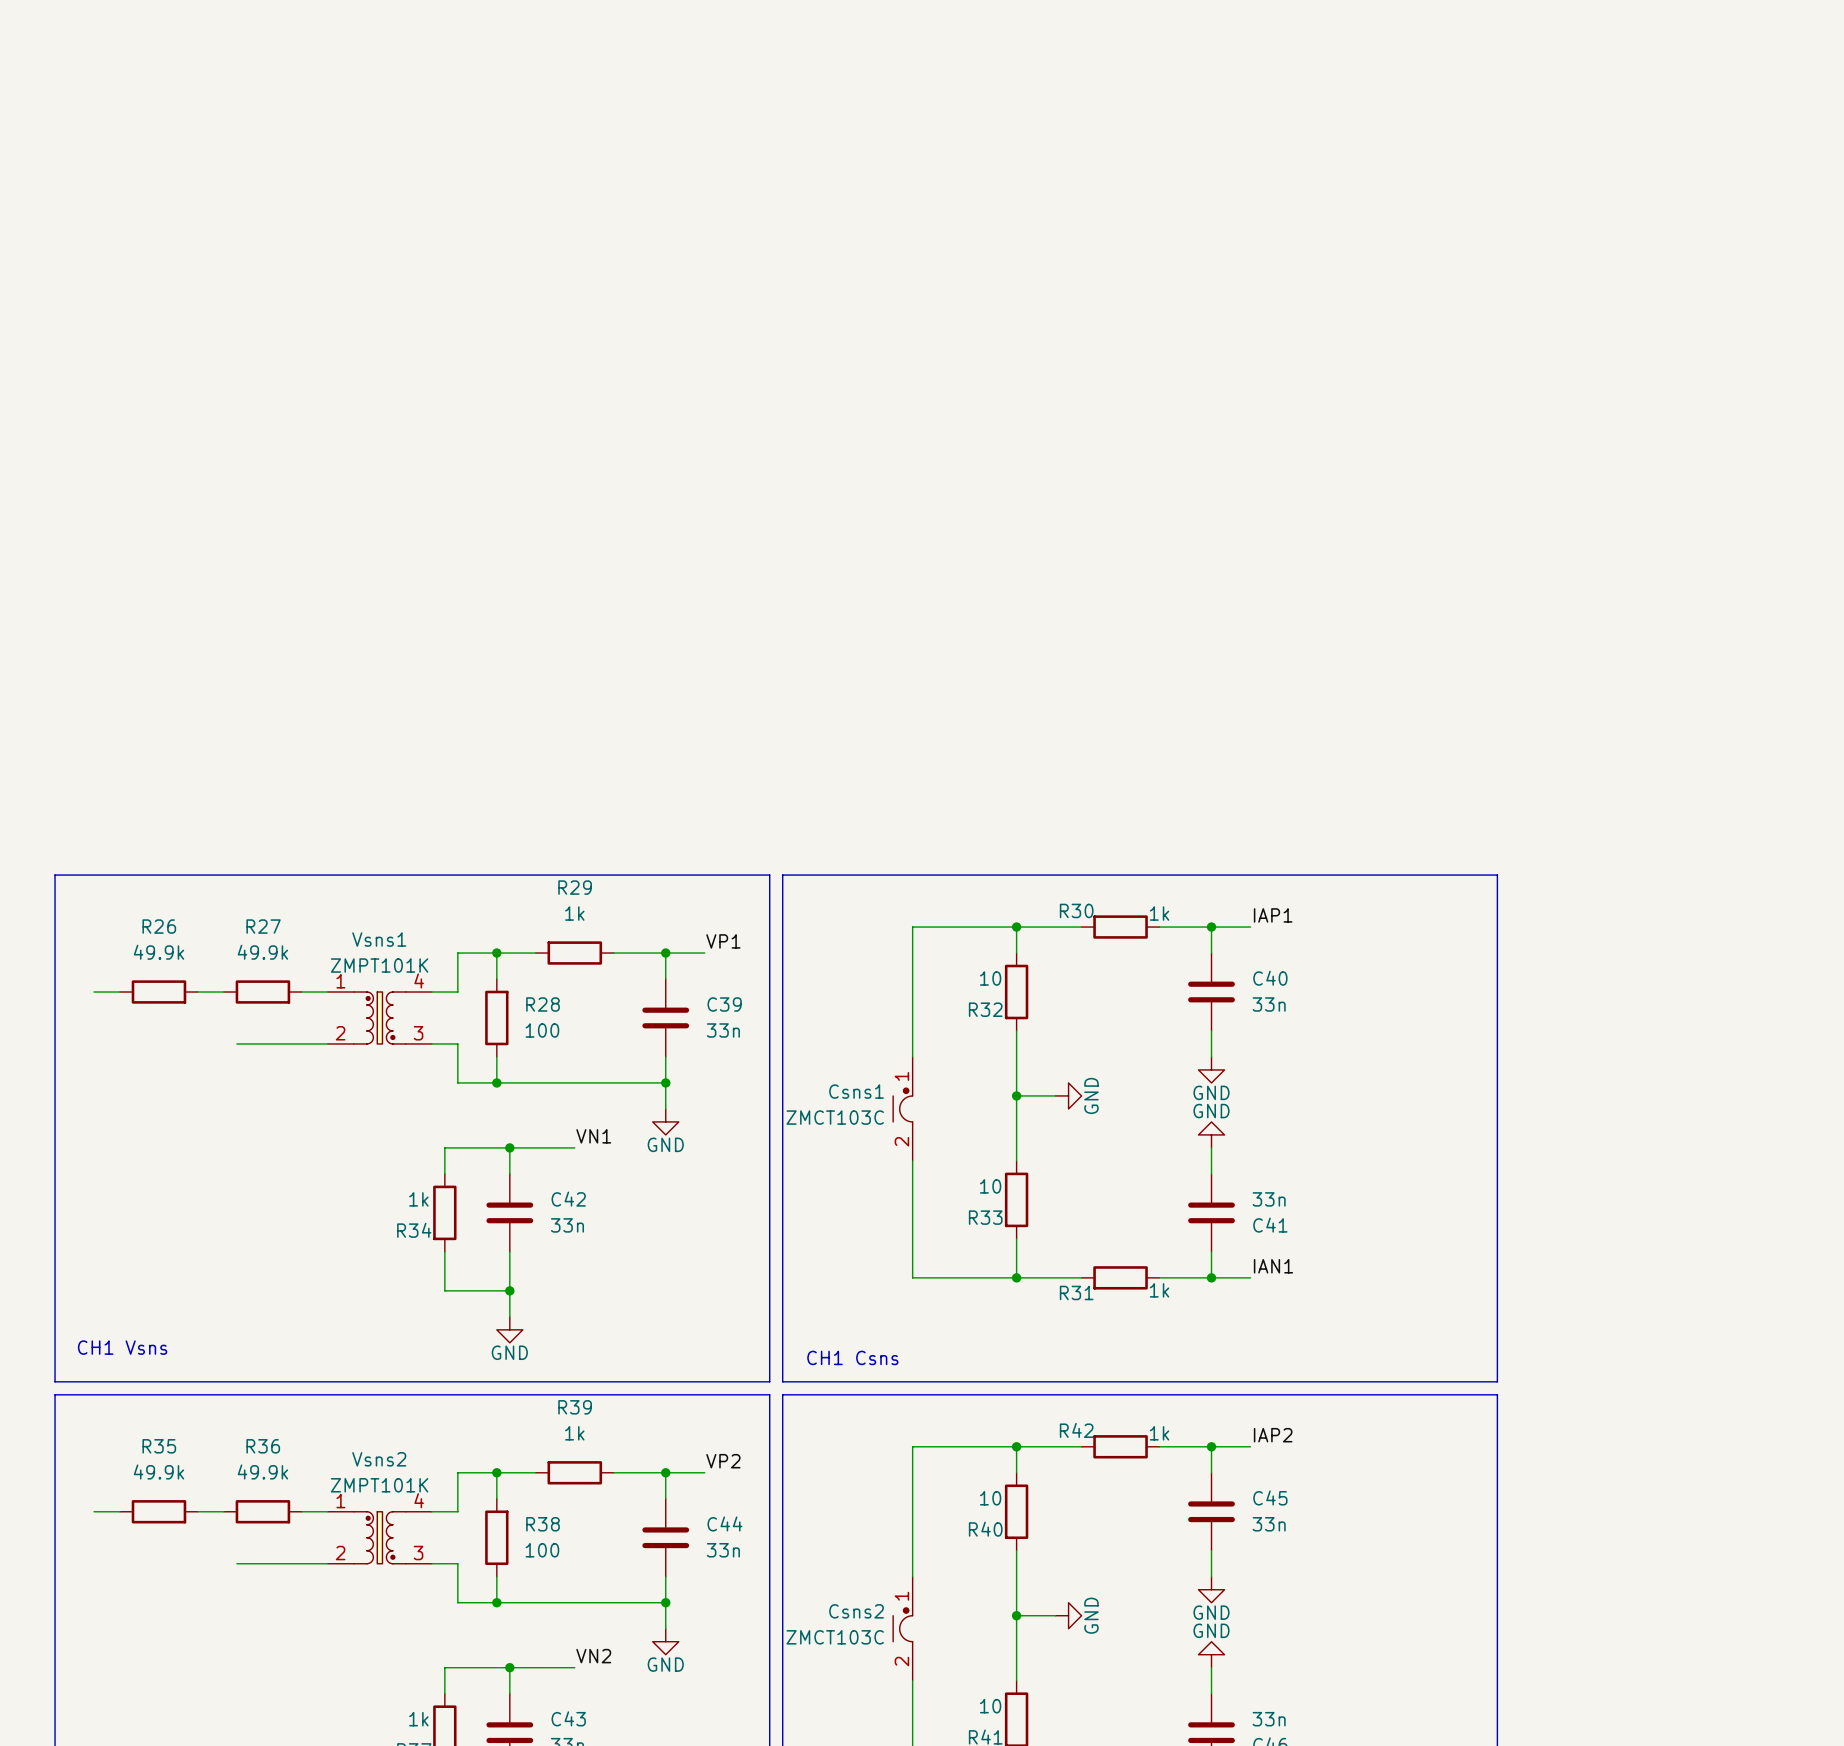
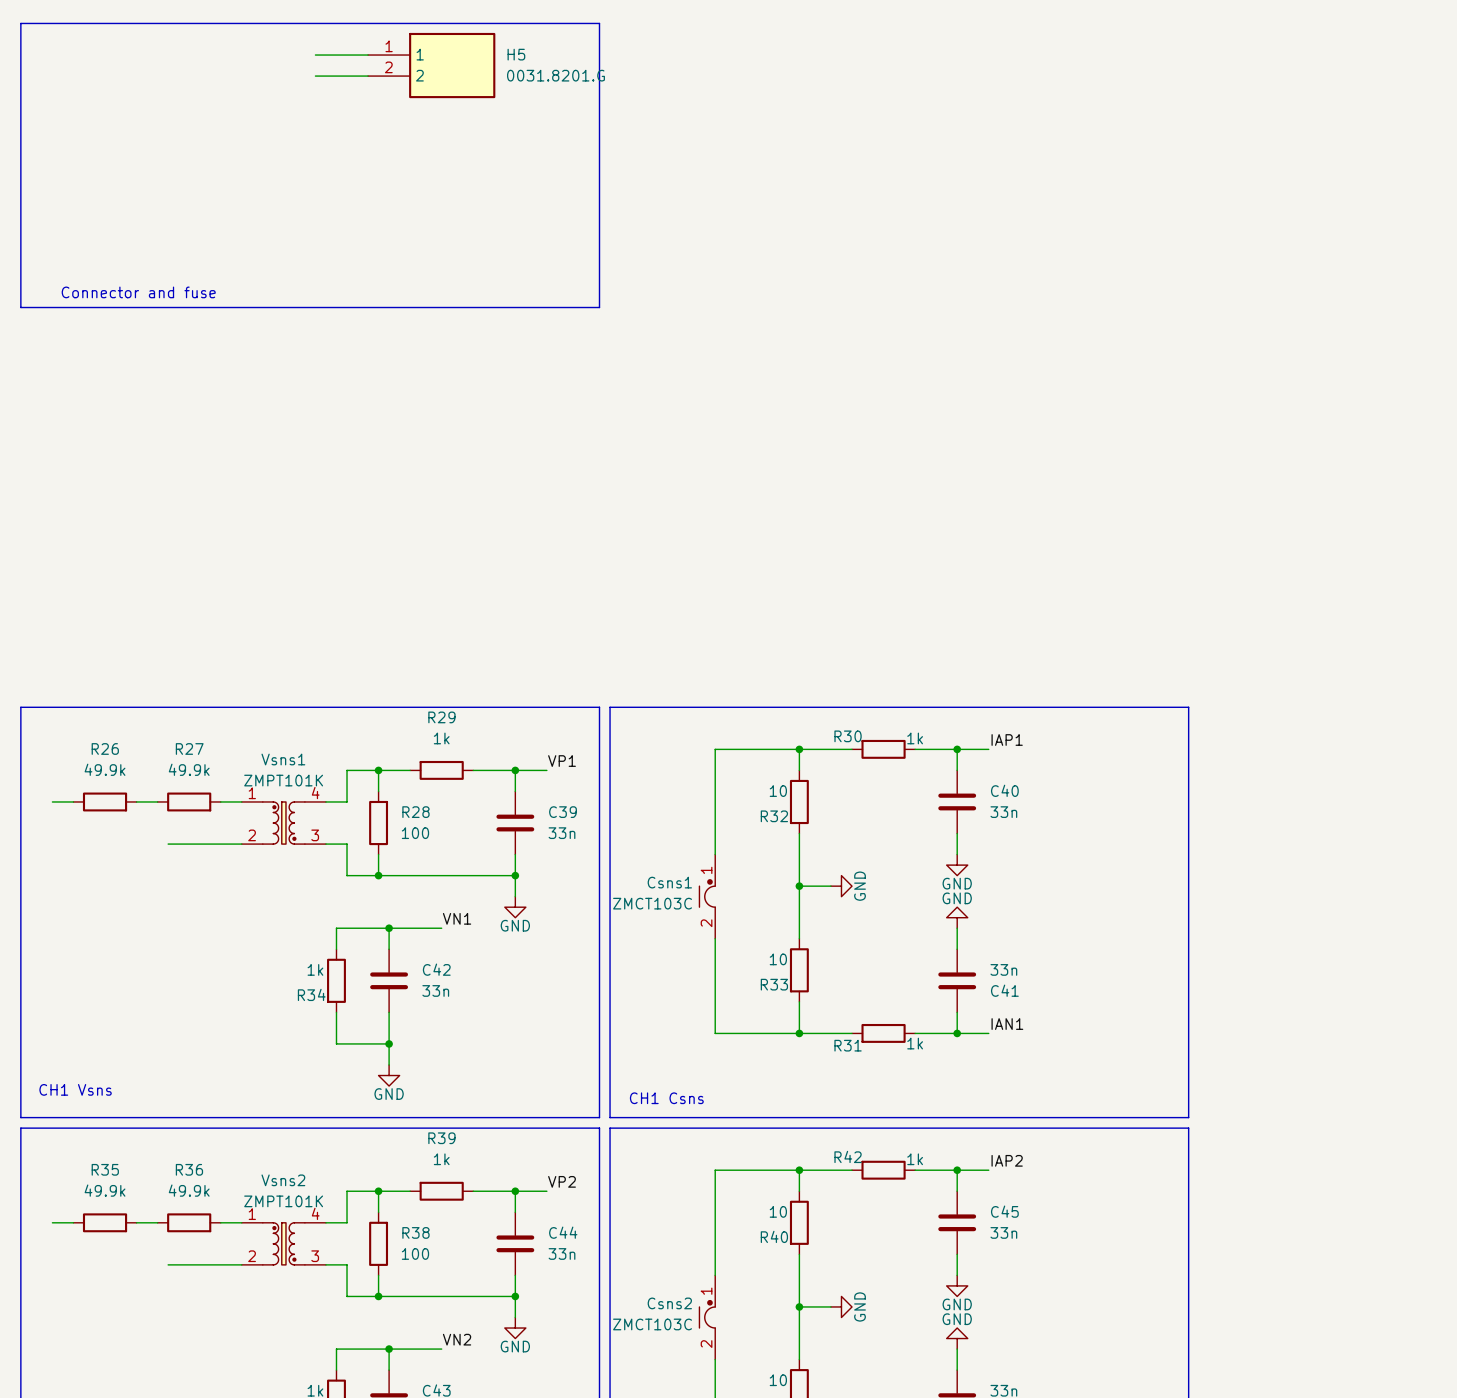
line: none -> (20, 23) (599, 23) (599, 307) (20, 307) (20, 23)
wire: none -> (315, 55) (368, 55)
H5: none -> 0031.8201.G (431, 65)
wire: none -> (315, 76) (368, 76)
text: none -> Connector and fuse (138, 292)

